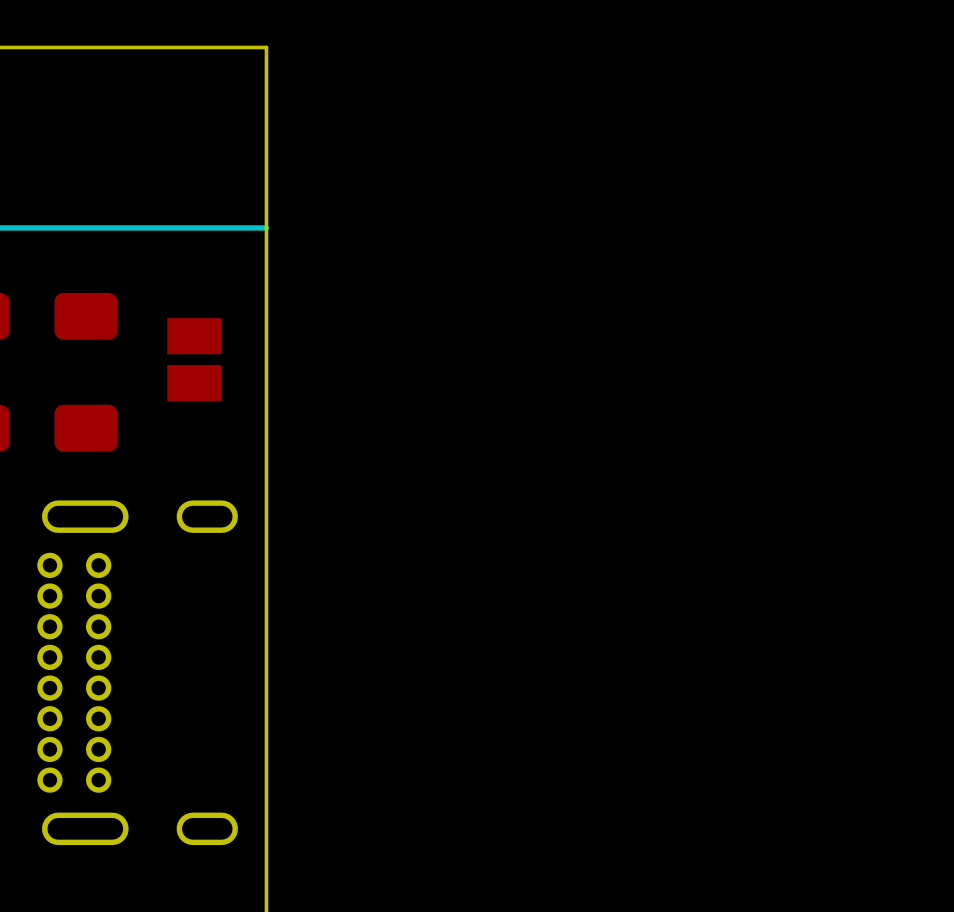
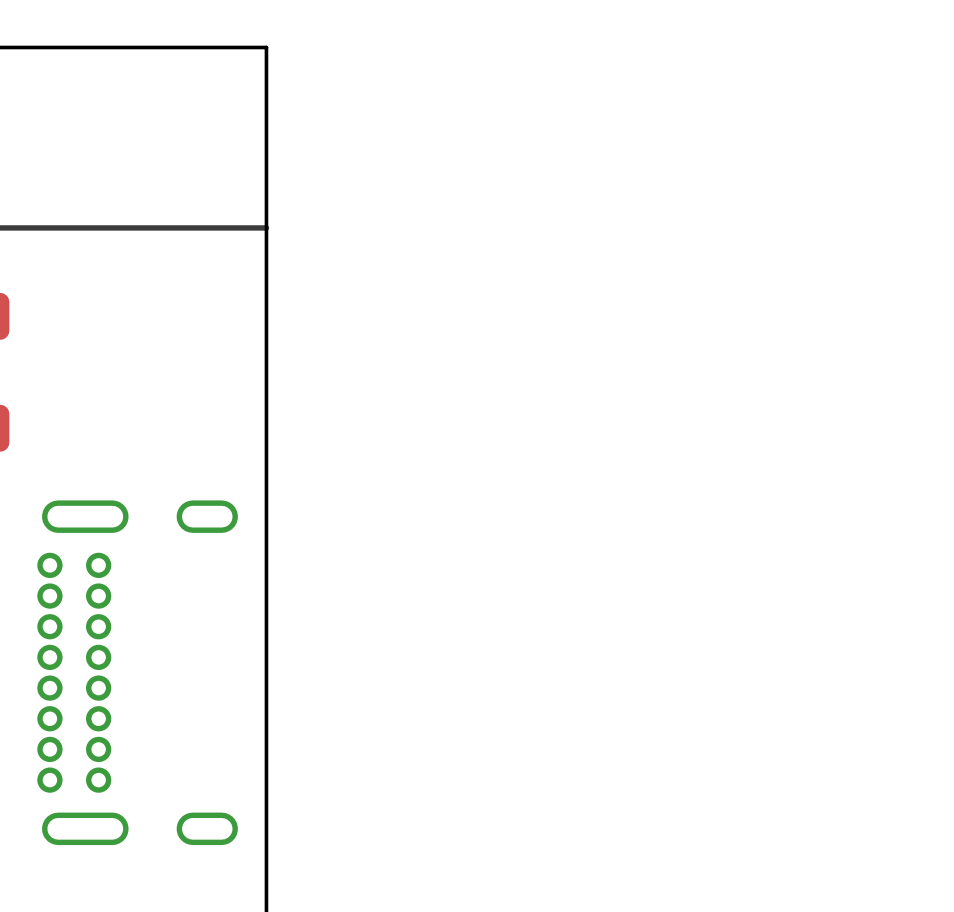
part: (194, 359) -> none
part: (86, 372) -> none

